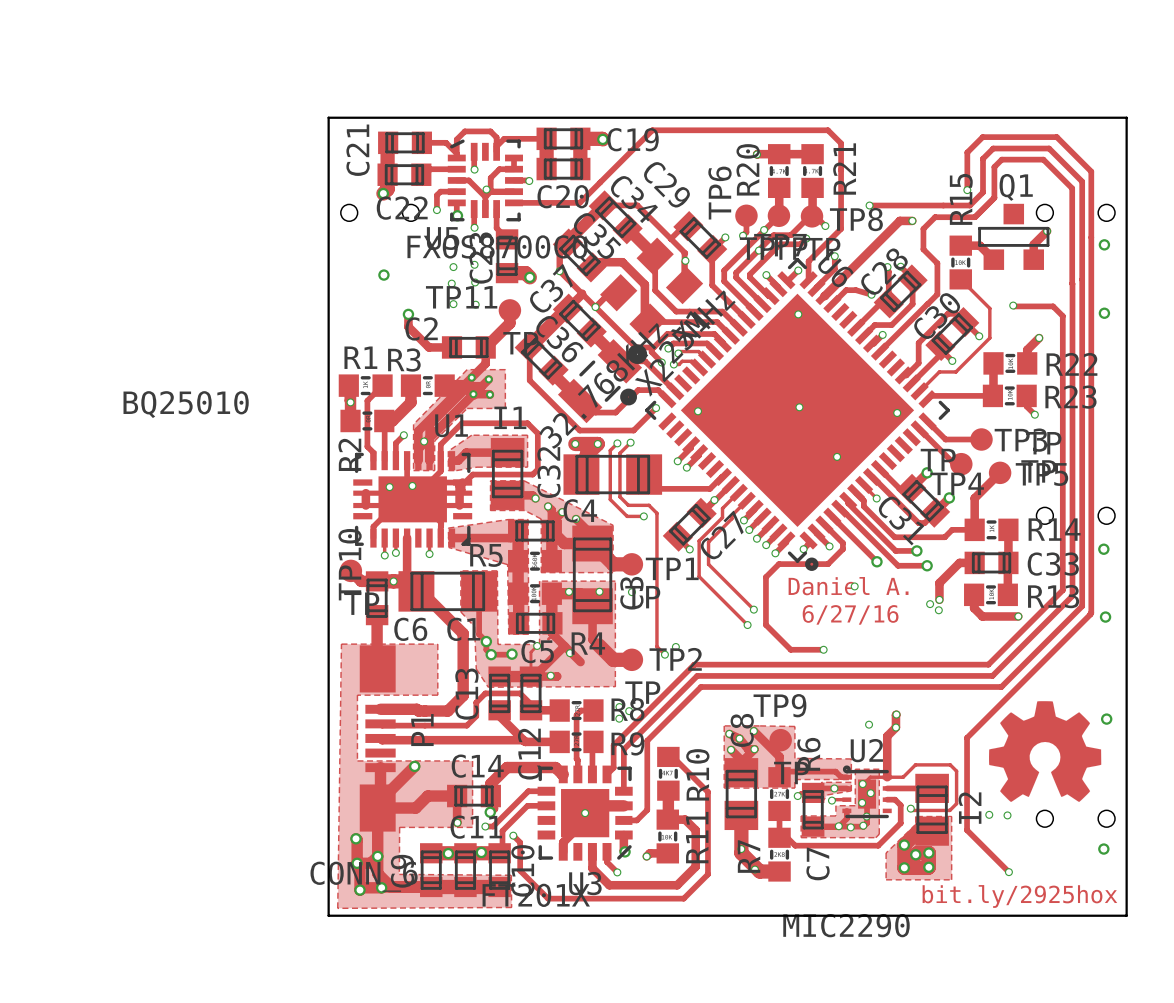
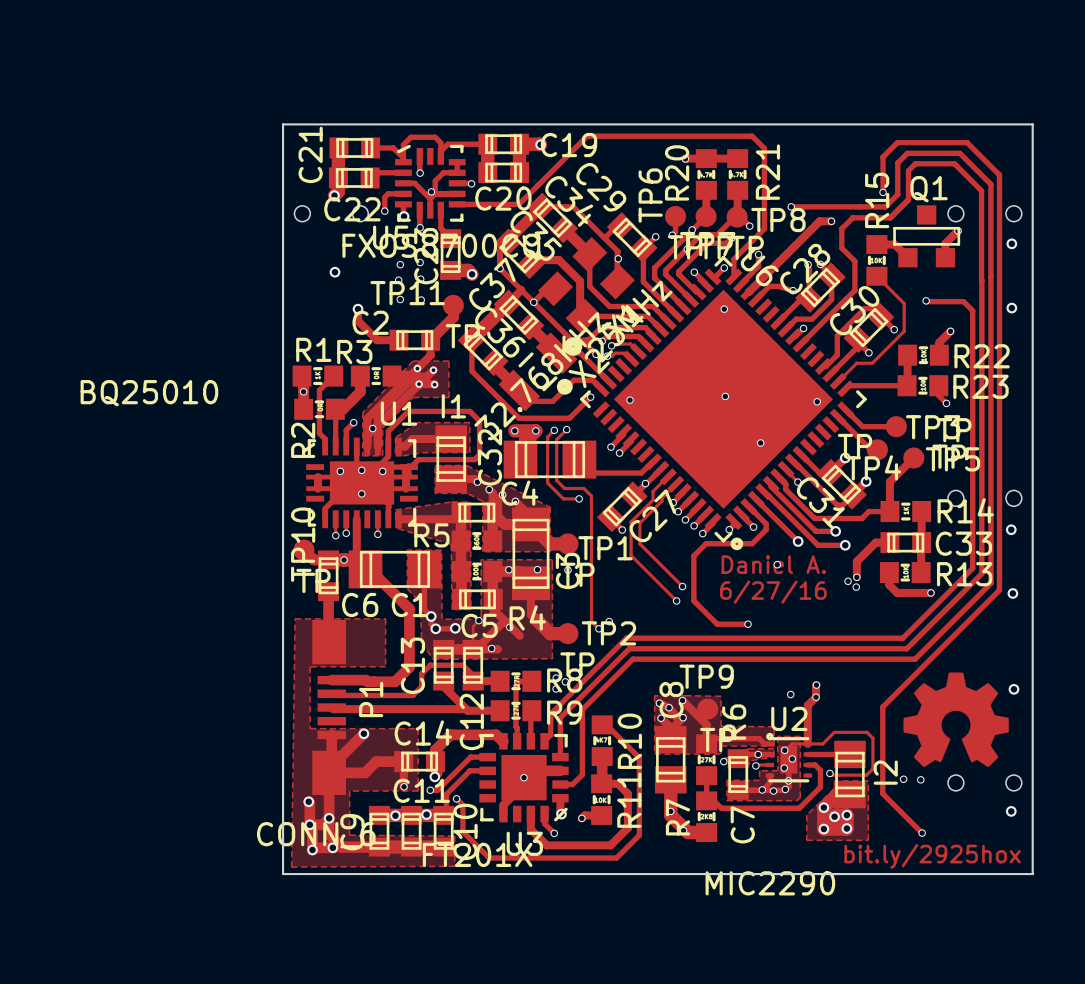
via: none -> (382, 471)
via: none -> (361, 493)

